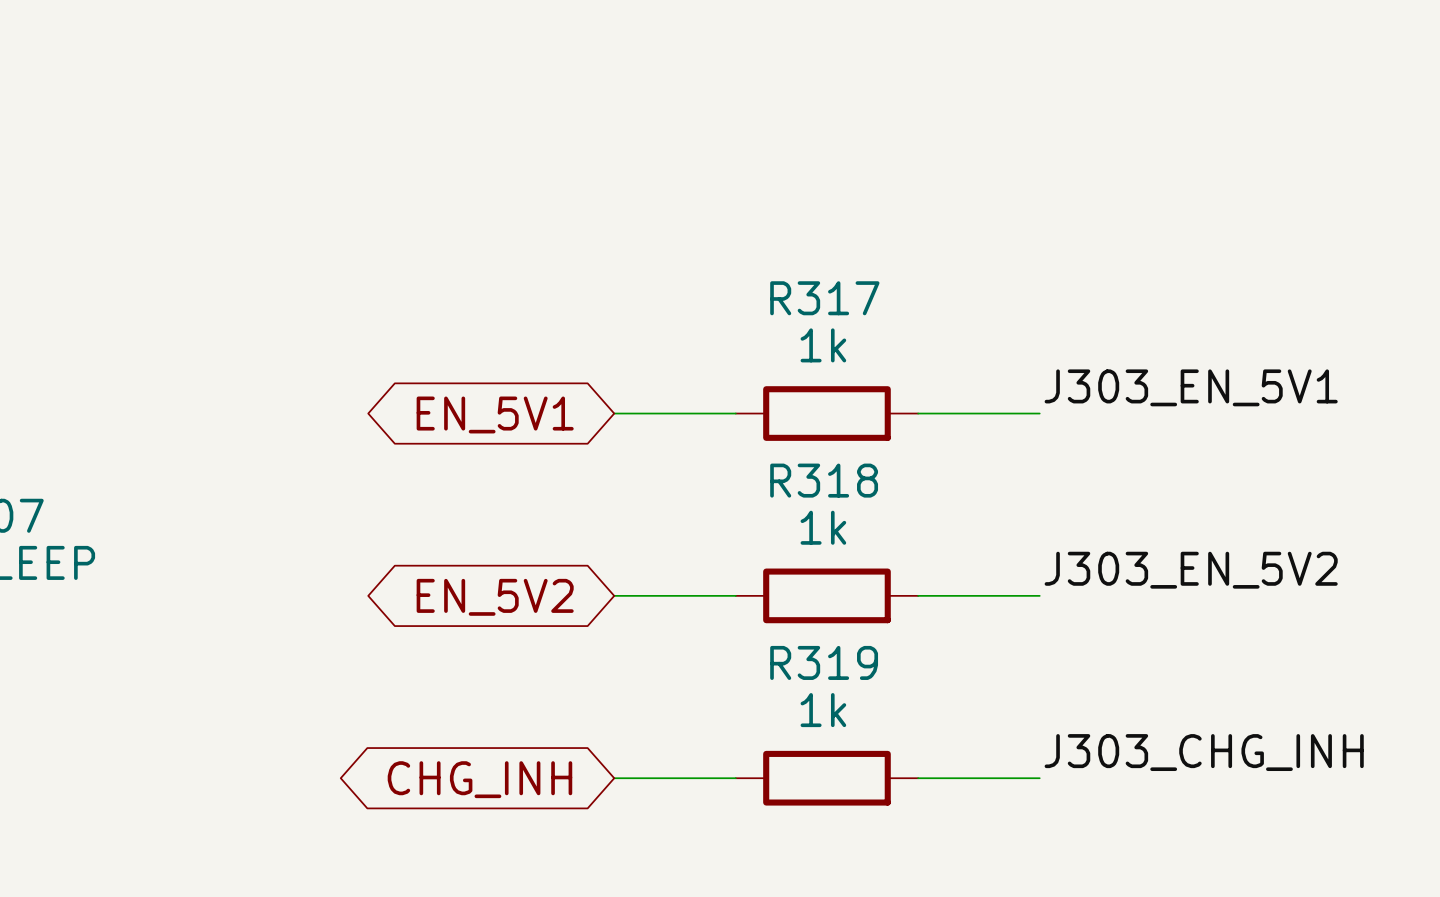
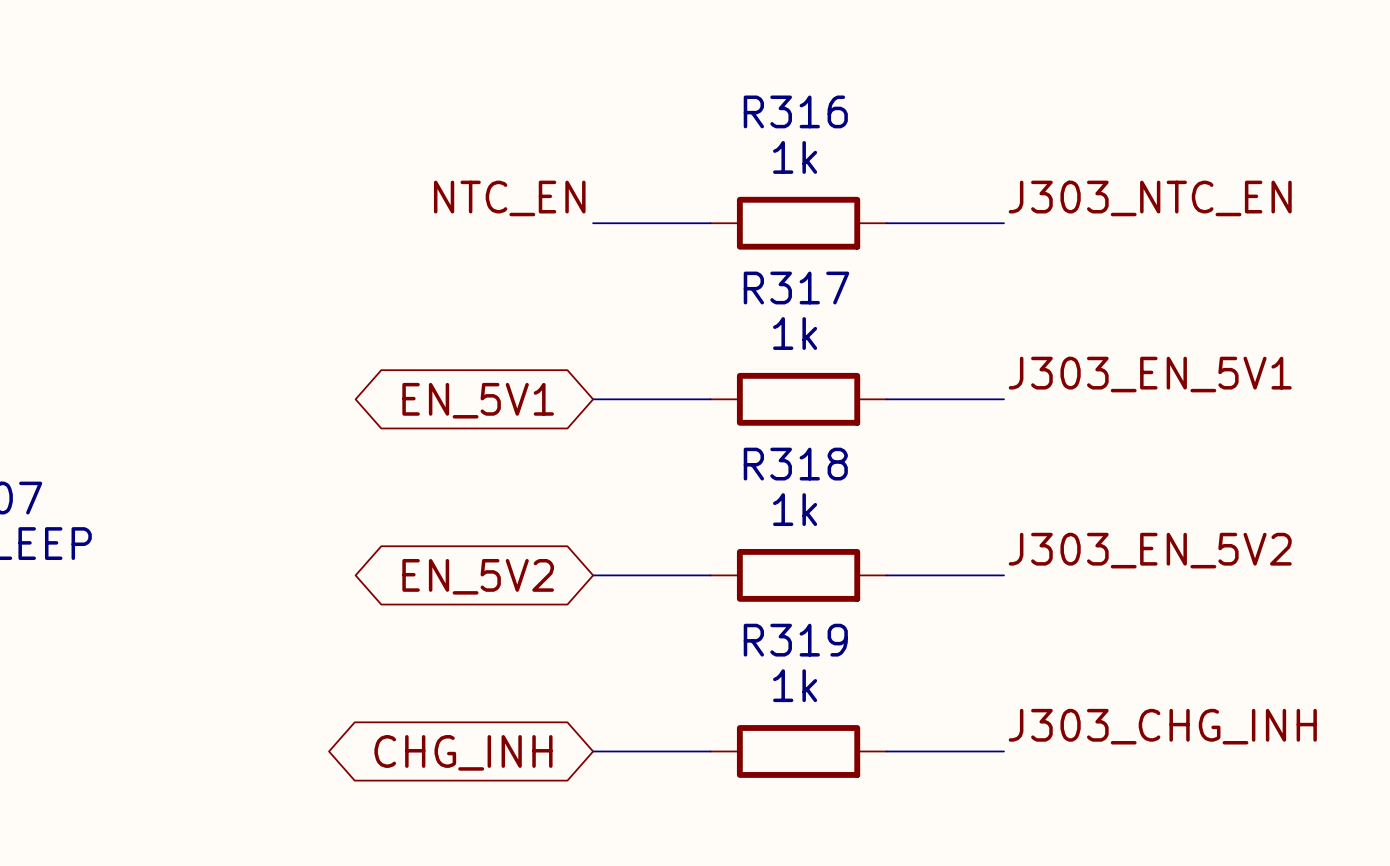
label: none -> NTC_EN (509, 198)
label: none -> J303_NTC_EN (1150, 198)
wire: none -> (593, 223) (710, 223)
R316: none -> 1k (798, 223)
wire: none -> (886, 223) (1003, 223)

